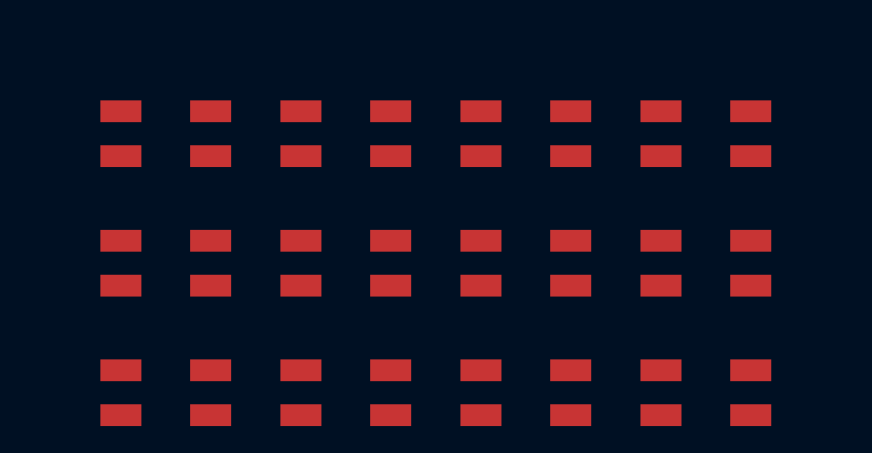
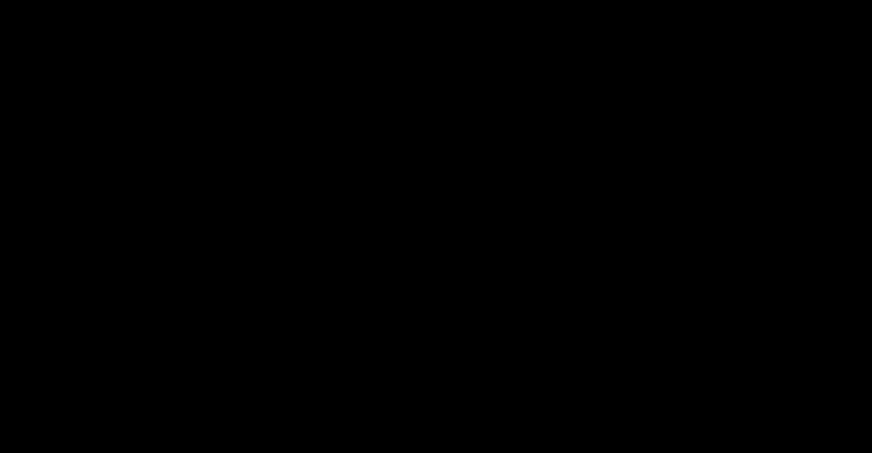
part: (165, 133) -> none
part: (345, 133) -> none
part: (525, 133) -> none
part: (705, 133) -> none
part: (165, 263) -> none
part: (345, 263) -> none
part: (525, 263) -> none
part: (705, 263) -> none
part: (165, 392) -> none
part: (345, 392) -> none
part: (525, 392) -> none
part: (705, 392) -> none

